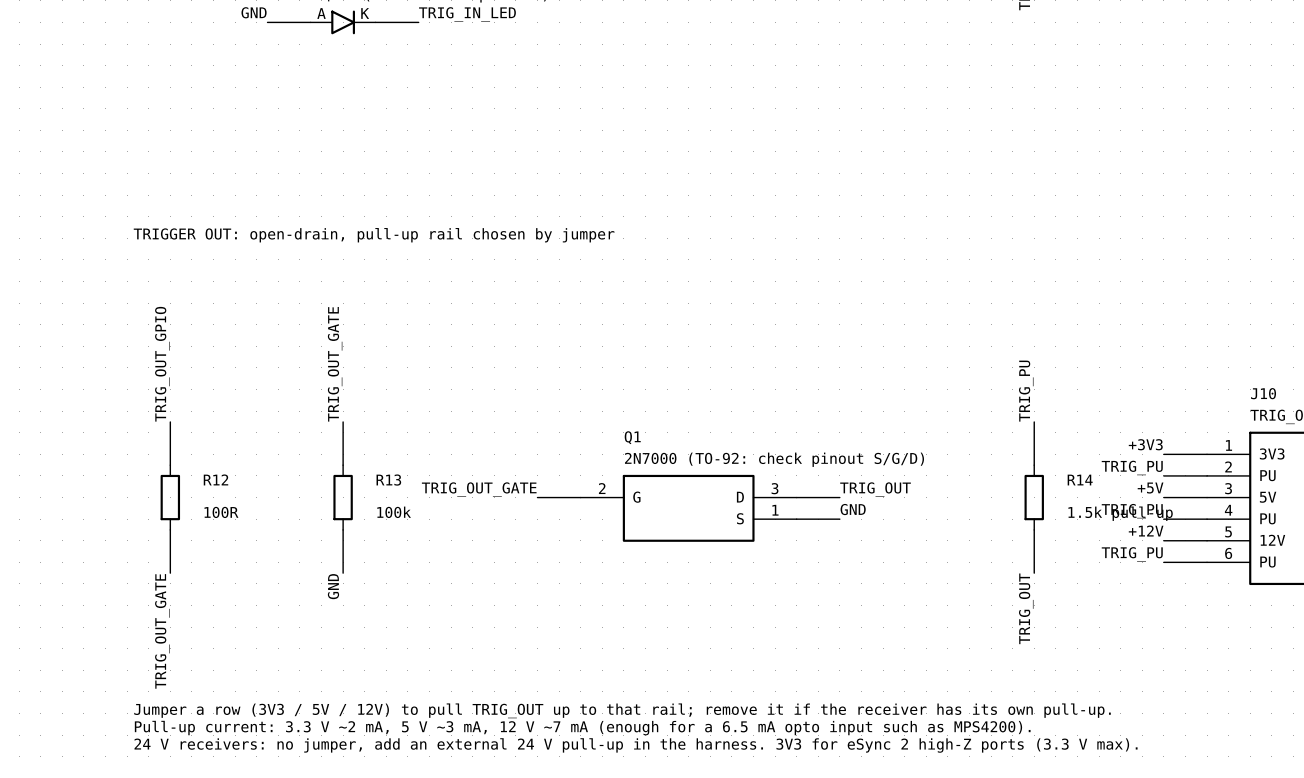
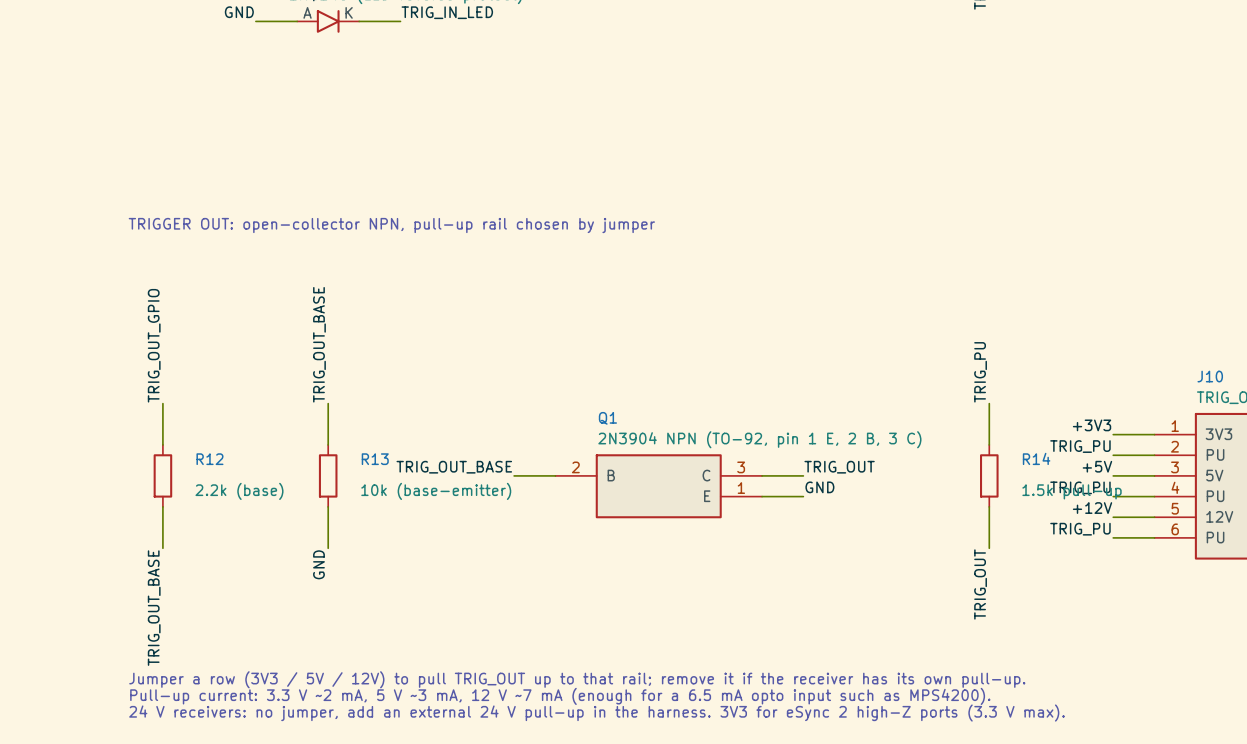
text: TRIGGER OUT: open-drain, pull-up rail chosen by jumper (374, 235) -> TRIGGER OUT: open-collector NPN, pull-up rail chosen by jumper (391, 225)
label: TRIG_OUT_GATE (335, 364) -> TRIG_OUT_BASE (319, 344)
Q1 value: 2N7000 (TO-92: check pinout S/G/D) (774, 459) -> 2N3904 NPN (TO-92, pin 1 E, 2 B, 3 C) (759, 439)
label: TRIG_OUT_GATE (479, 489) -> TRIG_OUT_BASE (454, 467)
Q1 pin name: G (636, 497) -> B (611, 475)
Q1 pin name: D (740, 497) -> C (706, 475)
R12 value: 100R (221, 512) -> 2.2k (base) (239, 491)
R13 value: 100k (394, 512) -> 10k (base-emitter) (436, 491)
Q1 pin name: S (740, 518) -> E (707, 496)
label: TRIG_OUT_GATE (162, 631) -> TRIG_OUT_BASE (154, 608)

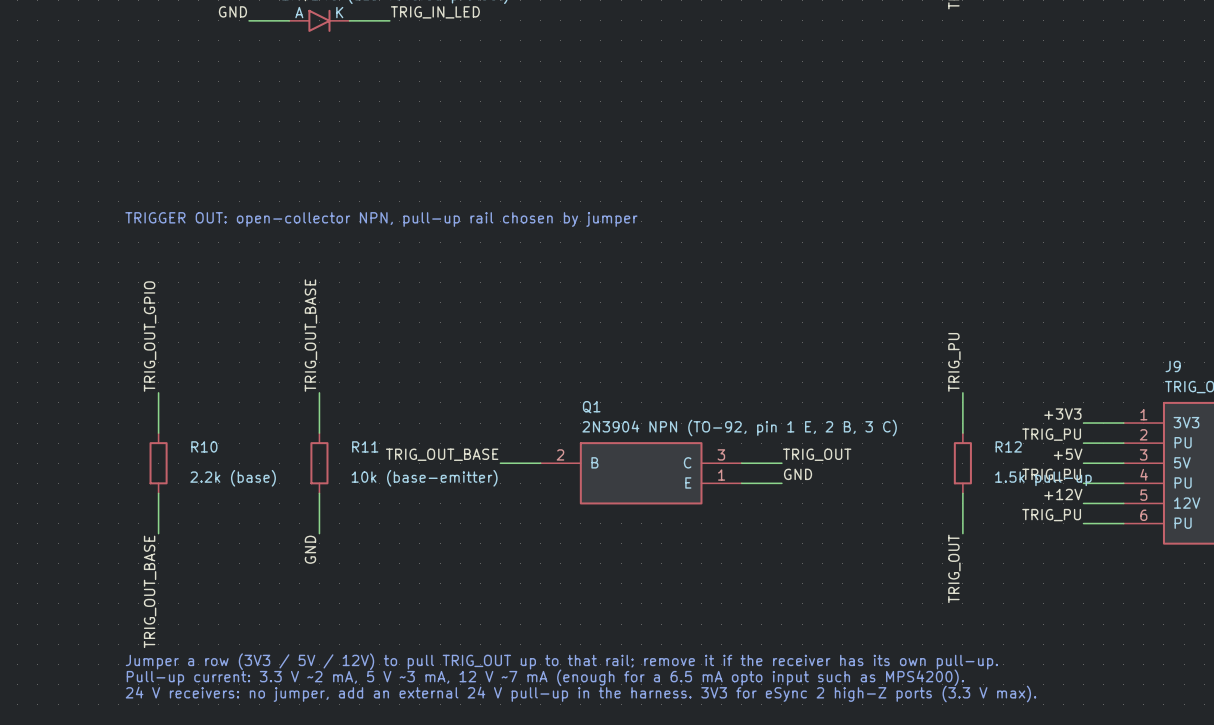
J10 name: J10 (1210, 376) -> J9 (1173, 366)
R14 name: R14 (1036, 458) -> R12 (1008, 446)
R12 name: R12 (209, 459) -> R10 (204, 446)
R13 name: R13 (375, 459) -> R11 (365, 446)

